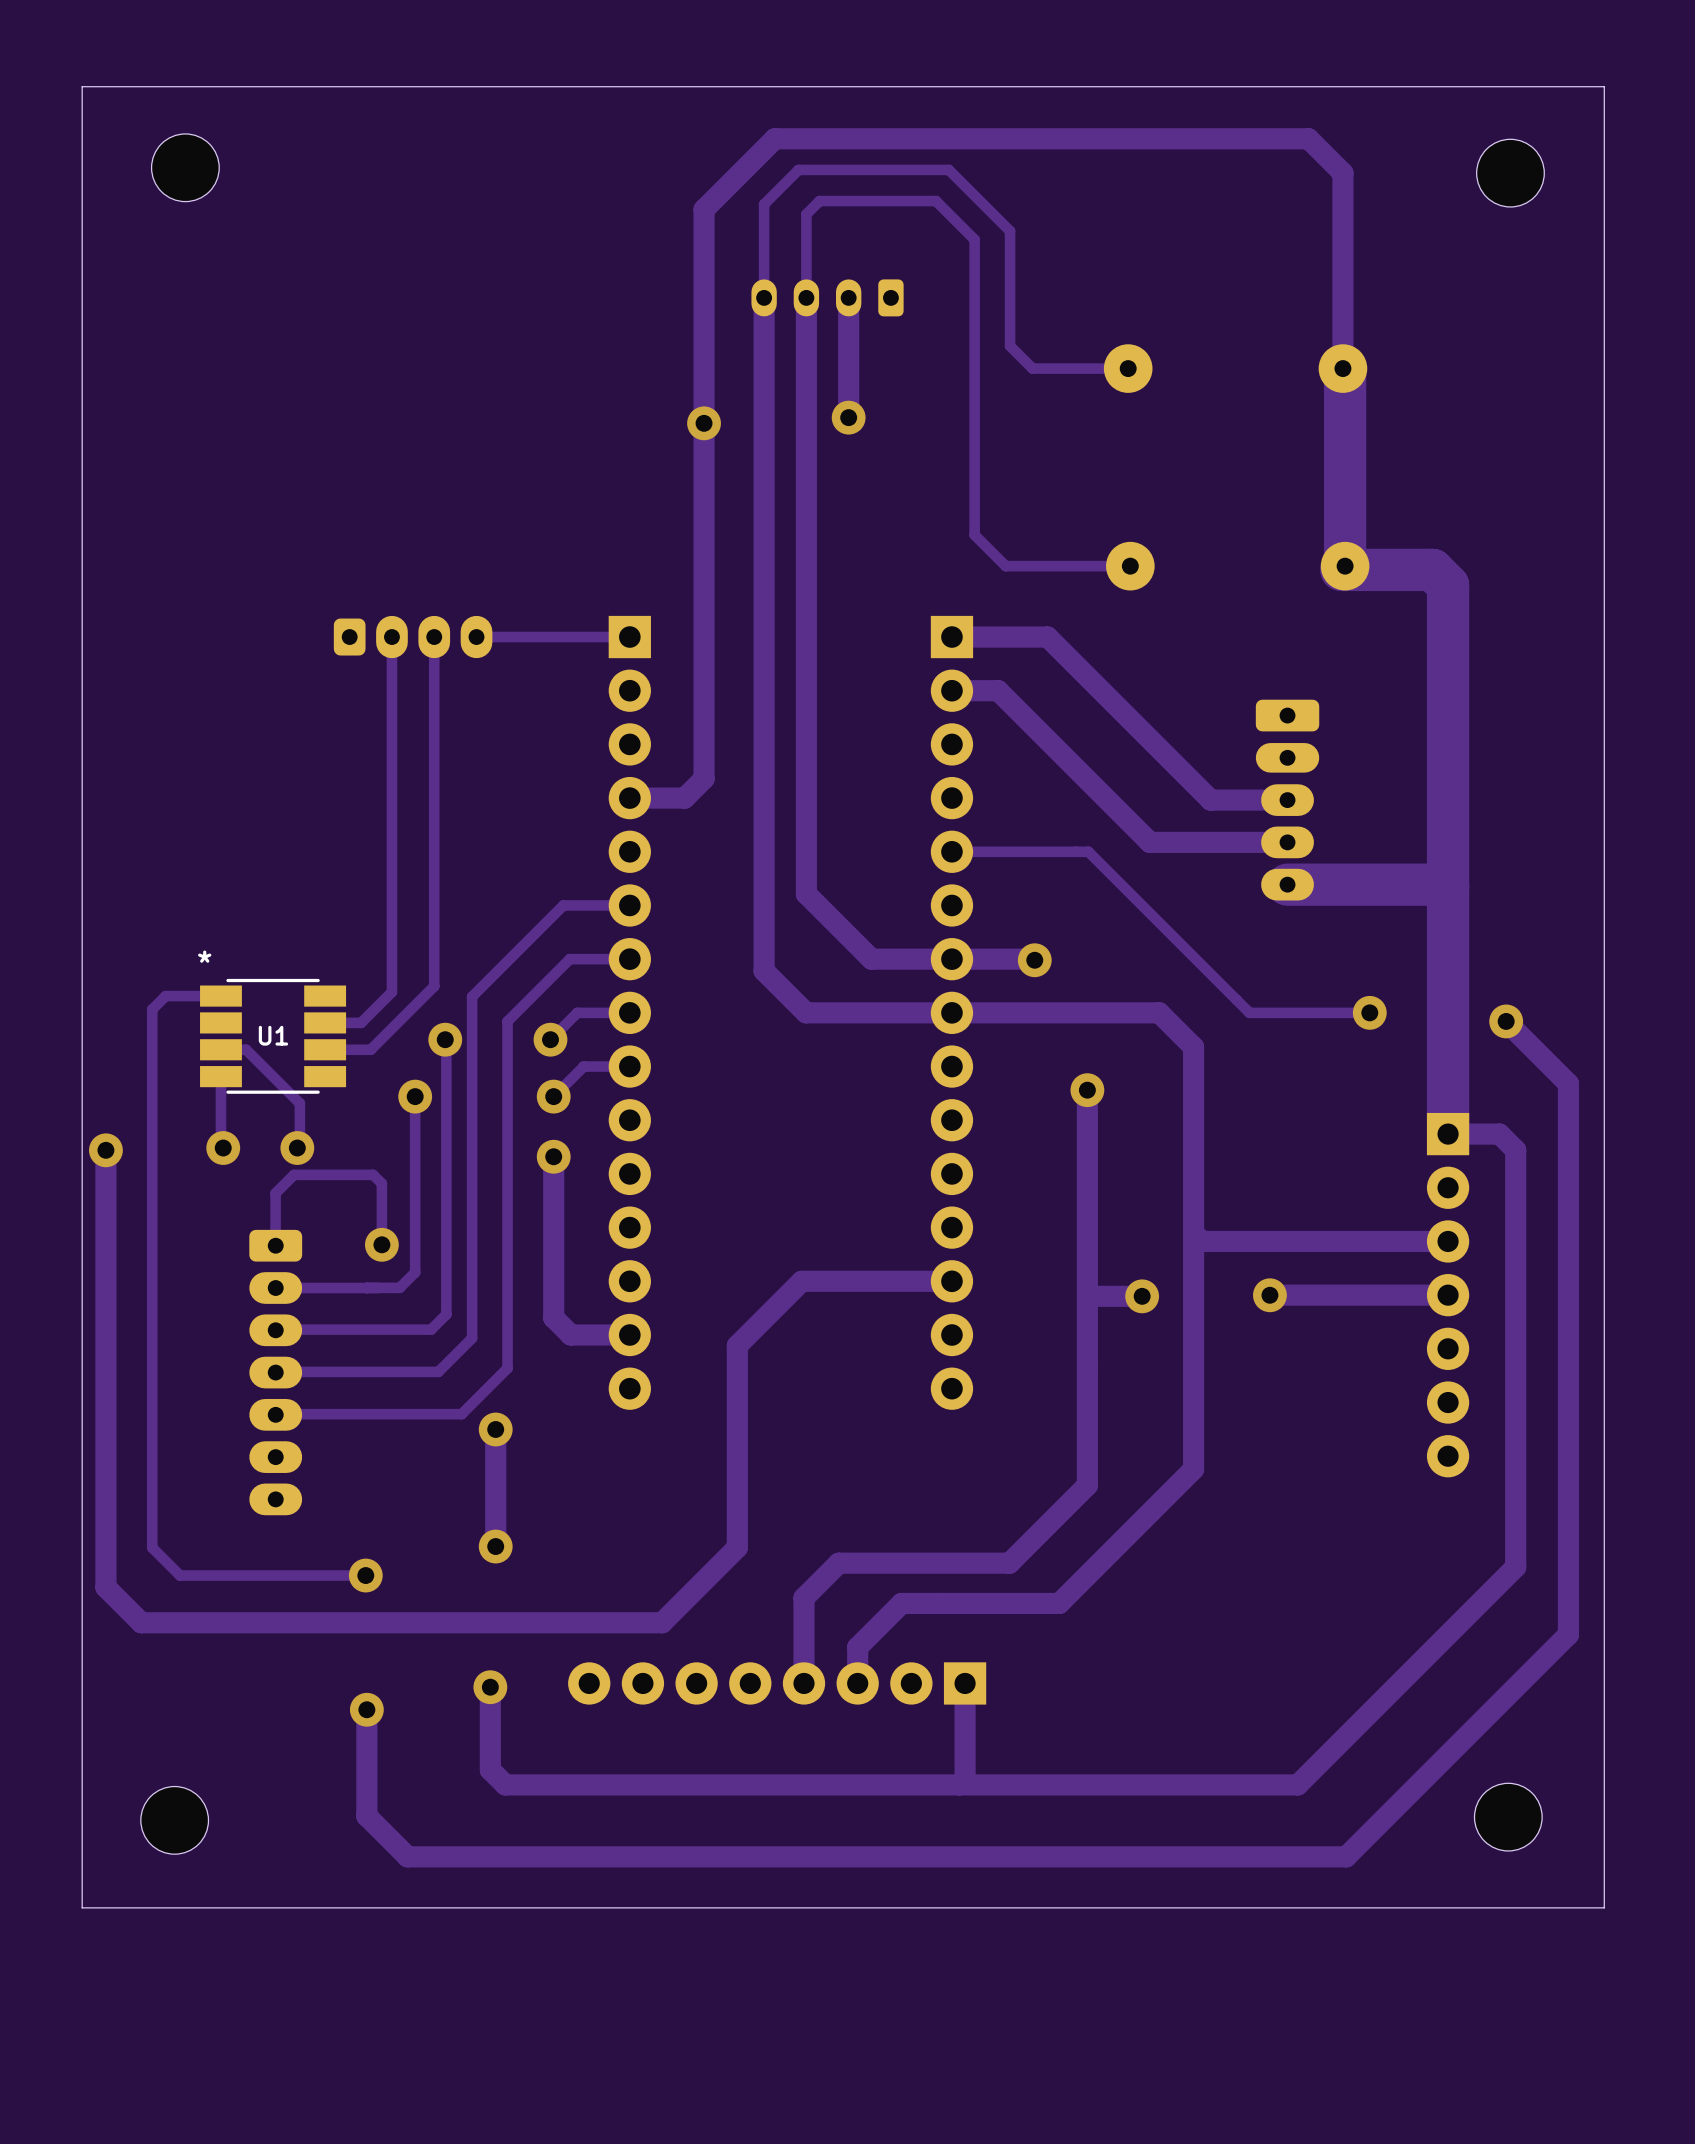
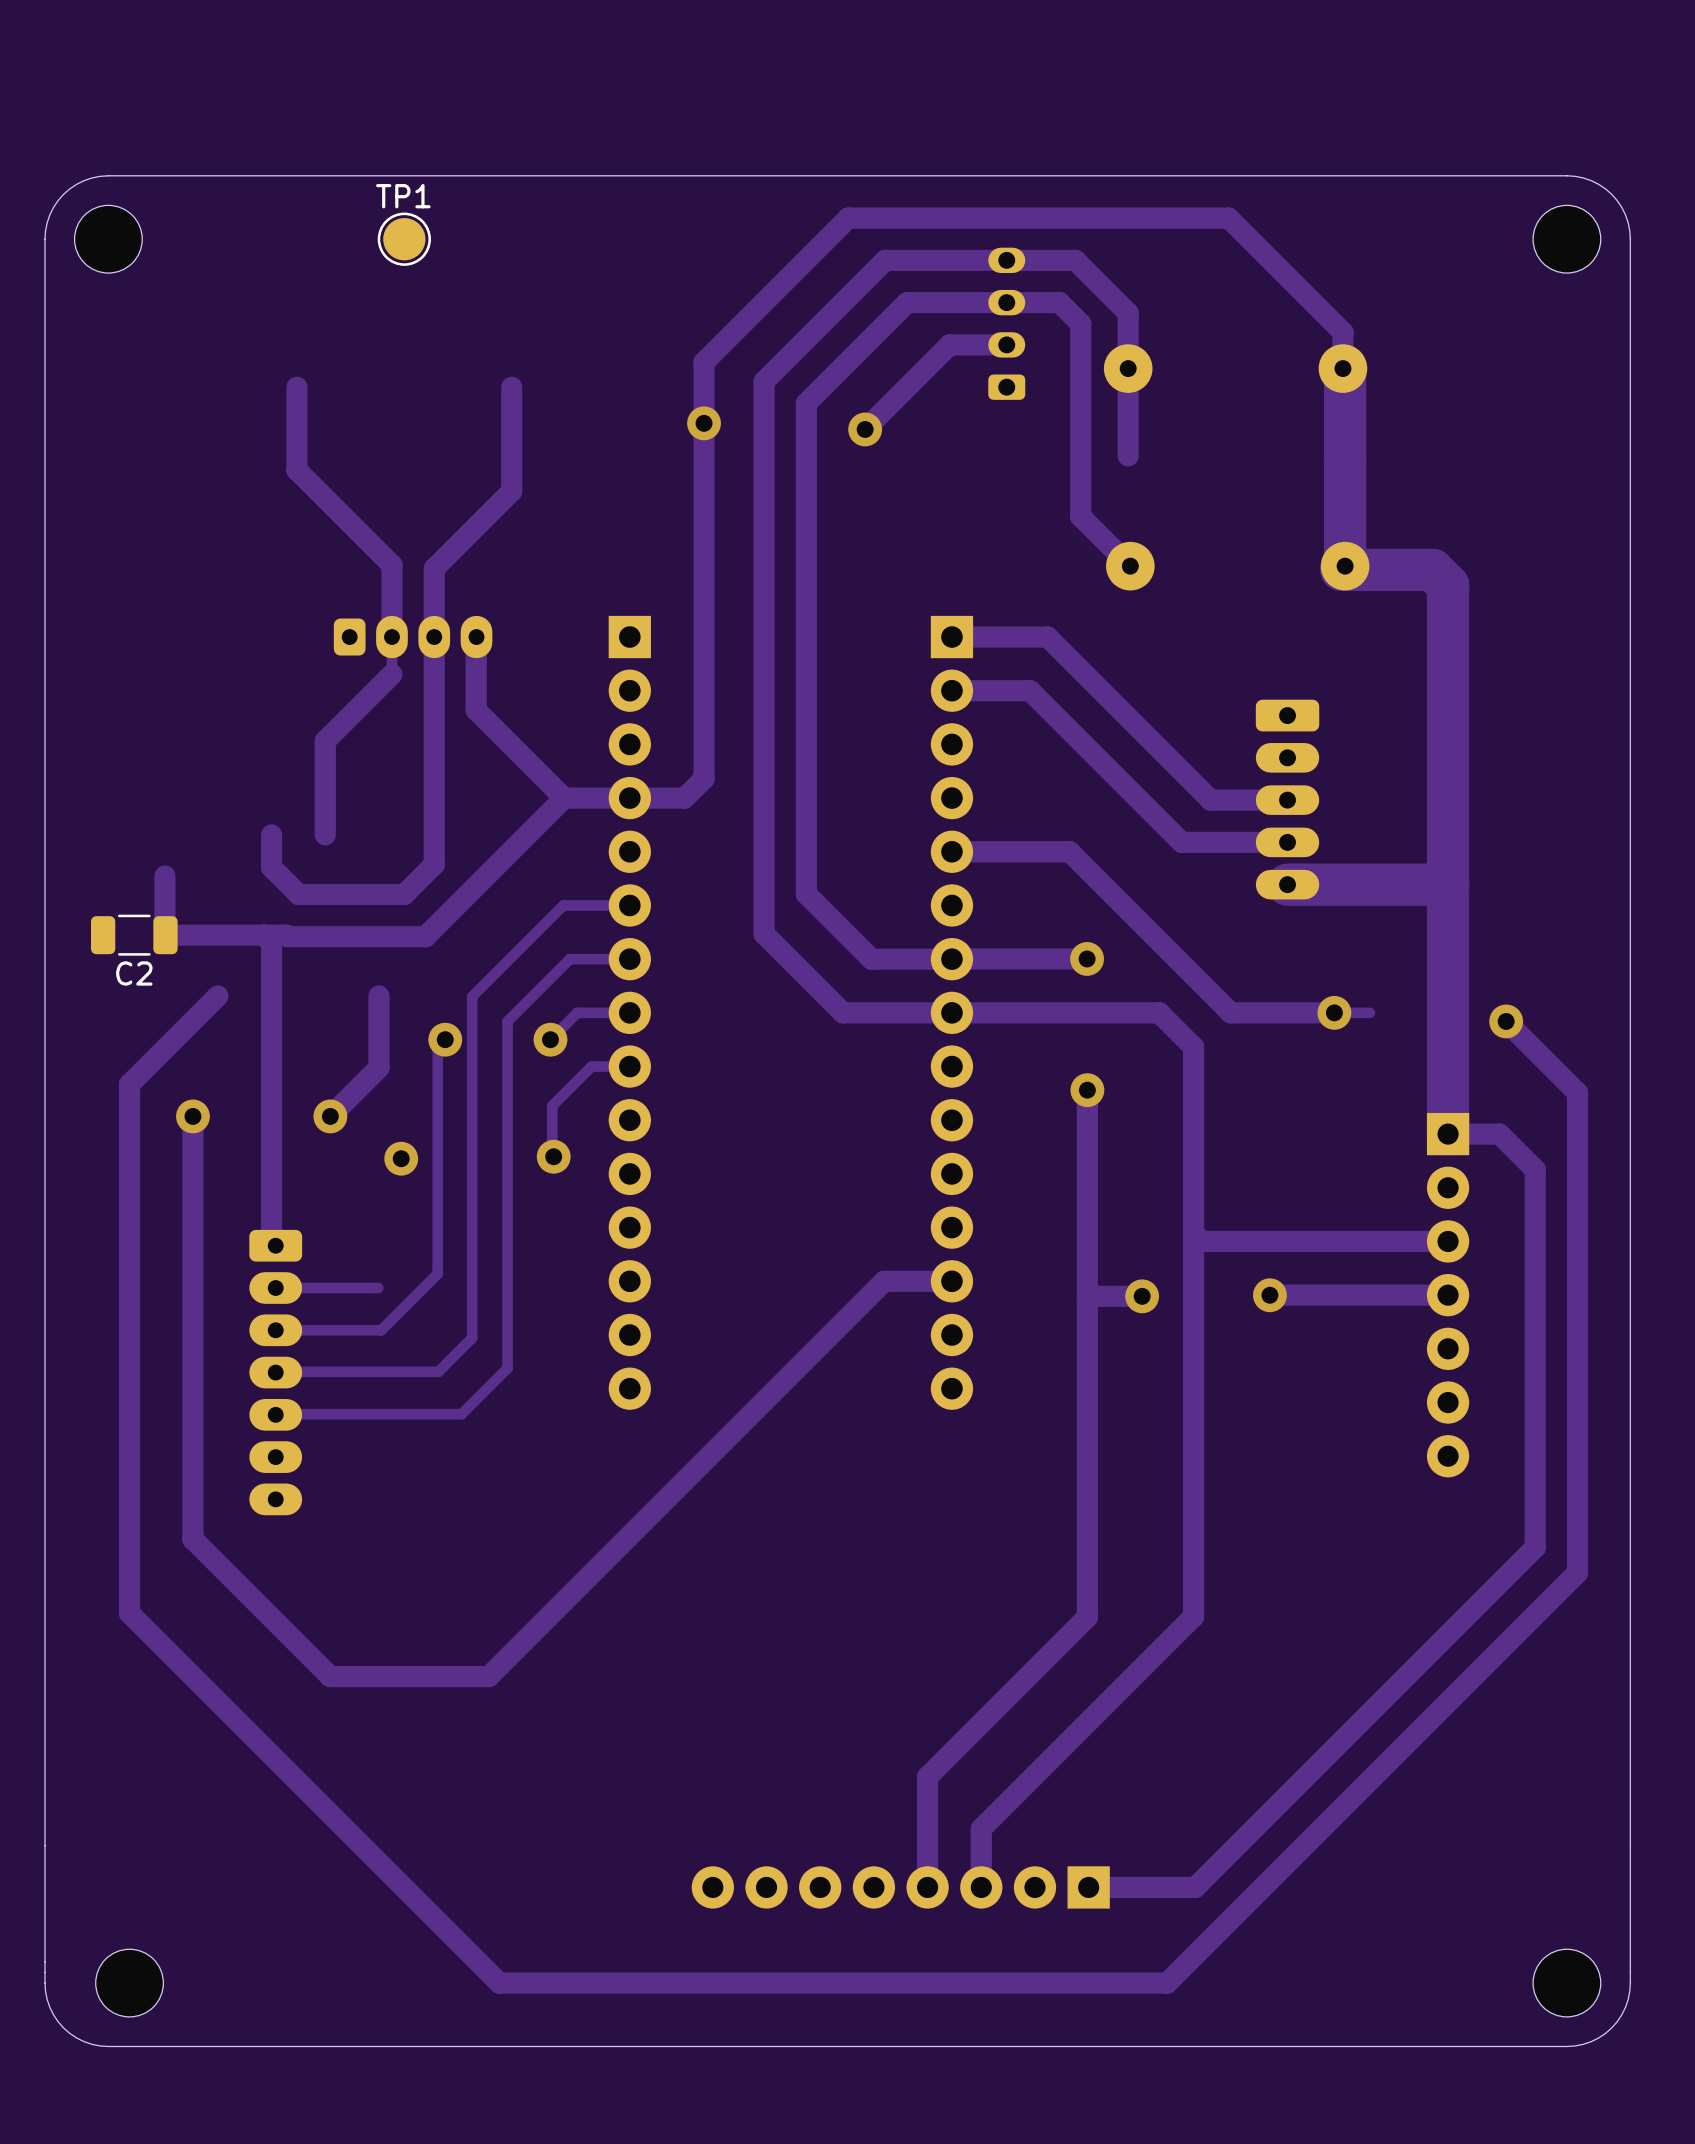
board edge: (1604, 86) (82, 86) (82, 1907) (1604, 1907) (1604, 86) -> (1566, 175) (1591, 180) (1611, 194) (1625, 214) (1630, 239) (1630, 1983) (1628, 1999) (1617, 2021) (1605, 2033) (1591, 2041) (1566, 2046) (108, 2046) (92, 2044) (69, 2033) (58, 2021) (49, 2007) (45, 1983) (45, 239) (49, 214) (58, 200) (69, 188) (84, 180) (108, 175) (1566, 175)
part position: (185, 167) -> (108, 239)
part position: (1510, 173) -> (1566, 239)
TP1: none -> (404, 239)
part: (827, 297) -> none
track: (848, 297) (848, 417) -> none
part: none -> (1006, 323)
track: (1342, 332) (1342, 173) (1308, 138) (774, 138) (704, 209) (704, 362) -> (1342, 332) (1228, 218) (848, 218) (704, 362)
track: none -> (1006, 344) (949, 344) (865, 429)
track: (1128, 368) (1032, 368) (1010, 346) (1010, 231) (948, 169) (798, 169) (764, 204) (764, 381) -> (1128, 455) (1128, 313) (1075, 260) (885, 260) (764, 381)
track: none -> (296, 387) (296, 470) (391, 565) (391, 637)
track: none -> (511, 387) (511, 491) (434, 568) (434, 637)
track: (806, 403) (806, 214) (819, 201) (935, 201) (974, 239) (974, 535) (1005, 566) (1130, 566) -> (806, 403) (907, 302) (1059, 302) (1080, 323) (1080, 516) (1130, 566)
via position: (848, 417) -> (865, 429)
track width: thin (434, 637) (434, 864) -> thick (434, 637) (434, 864)
track: (629, 637) (476, 637) -> (564, 798) (476, 710) (476, 636)
track: (391, 674) (391, 992) (361, 1022) (325, 1022) -> (391, 674) (325, 741) (325, 834)
track: (998, 690) (1149, 842) (1181, 842) -> (998, 690) (1030, 690) (1181, 842)
part footprint: [1255, 699, 1320, 901] -> [1255, 699, 1320, 900]
track: none -> (564, 798) (425, 936) (165, 935) (164, 875)
track: none -> (629, 798) (564, 798)
track: (1069, 851) (1088, 851) (1249, 1012) -> (1069, 851) (1230, 1012) (1249, 1012)
track width: thin (1069, 851) (951, 851) -> thick (1069, 851) (951, 851)
track: (434, 864) (434, 986) (370, 1049) (325, 1049) -> (434, 864) (404, 894) (298, 894) (271, 867) (271, 834)
track: (764, 934) (764, 970) (806, 1012) (842, 1012) -> (764, 934) (842, 1012)
C2: none -> (134, 935)
track: (951, 959) (1034, 960) -> (952, 958) (1087, 958)
via position: (1034, 960) -> (1087, 958)
track: none -> (378, 995) (378, 1067) (330, 1116)
track: (220, 996) (165, 996) (152, 1009) (152, 1547) (180, 1575) (365, 1575) -> none
track width: thin (1334, 1012) (1249, 1012) -> thick (1334, 1012) (1249, 1012)
via position: (1369, 1012) -> (1334, 1012)
U1: (273, 1036) -> none
track: none -> (437, 1039) (437, 1273) (381, 1330) (275, 1330)
track: (446, 1039) (446, 1314) (431, 1329) (273, 1329) -> none
track: (220, 1049) (246, 1049) (299, 1103) (299, 1143) -> none
track: (591, 1066) (583, 1066) (553, 1096) -> (591, 1066) (552, 1105) (552, 1158)
track: (220, 1076) (220, 1145) -> none
track: (1568, 1083) (1568, 1634) (1346, 1856) (407, 1856) (366, 1816) (366, 1709) -> (1568, 1083) (1577, 1092) (1577, 1572) (1167, 1983) (499, 1983) (129, 1613) (129, 1084) (217, 995)
track: (415, 1096) (415, 1272) (399, 1287) (367, 1287) -> none
via: (415, 1096) -> none
via: (553, 1096) -> none
via: none -> (330, 1116)
via position: (223, 1148) -> (192, 1116)
via: (297, 1148) -> none
track: (105, 1150) (105, 1587) (141, 1622) (662, 1622) (737, 1547) (737, 1345) (801, 1281) (884, 1281) -> (192, 1116) (192, 1539) (330, 1676) (488, 1676) (884, 1281)
via: (105, 1150) -> none
track: (1515, 1150) (1515, 1567) -> (1515, 1150) (1535, 1169) (1535, 1547) (1515, 1567)
track: (553, 1156) (553, 1317) (570, 1335) (629, 1335) -> none
via: none -> (401, 1158)
track: (381, 1244) (381, 1183) (373, 1174) (293, 1174) (275, 1193) (275, 1245) -> (263, 935) (271, 943) (271, 1241) (275, 1245)
via: (381, 1244) -> none
track: (495, 1429) (495, 1546) -> none
via: (495, 1429) -> none
track: (1193, 1469) (1059, 1603) (901, 1603) (857, 1647) (857, 1683) -> (1193, 1469) (1193, 1616) (981, 1828) (981, 1887)
track: (1087, 1485) (1009, 1563) (838, 1563) (804, 1597) (804, 1683) -> (1087, 1485) (1087, 1617) (927, 1776) (927, 1887)
via: (495, 1546) -> none
via: (365, 1575) -> none
part position: (777, 1683) -> (900, 1887)
track: (965, 1683) (965, 1779) (959, 1784) -> none
track: (490, 1687) (490, 1769) (505, 1784) (1297, 1784) -> (1088, 1887) (1195, 1887) (1297, 1784)
via: (490, 1687) -> none
via: (366, 1709) -> none
part position: (1508, 1817) -> (1566, 1983)
part position: (174, 1820) -> (129, 1983)

